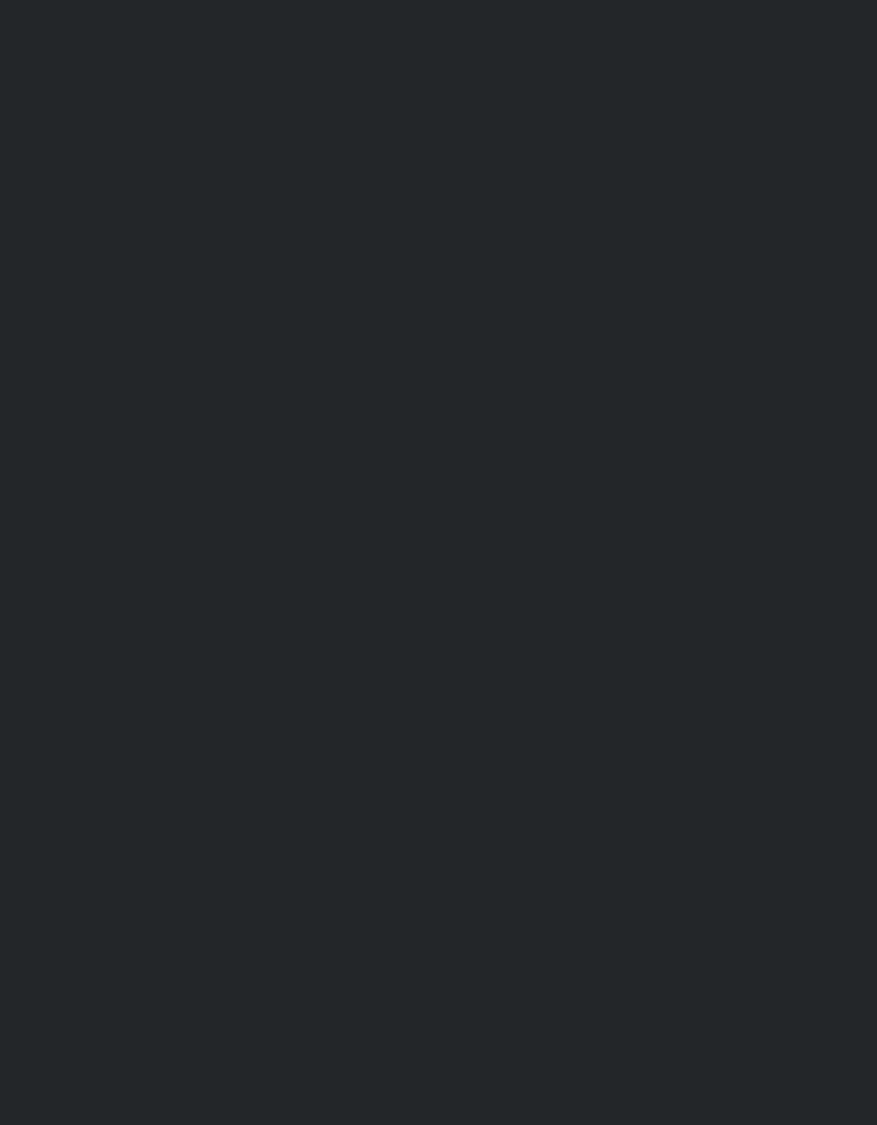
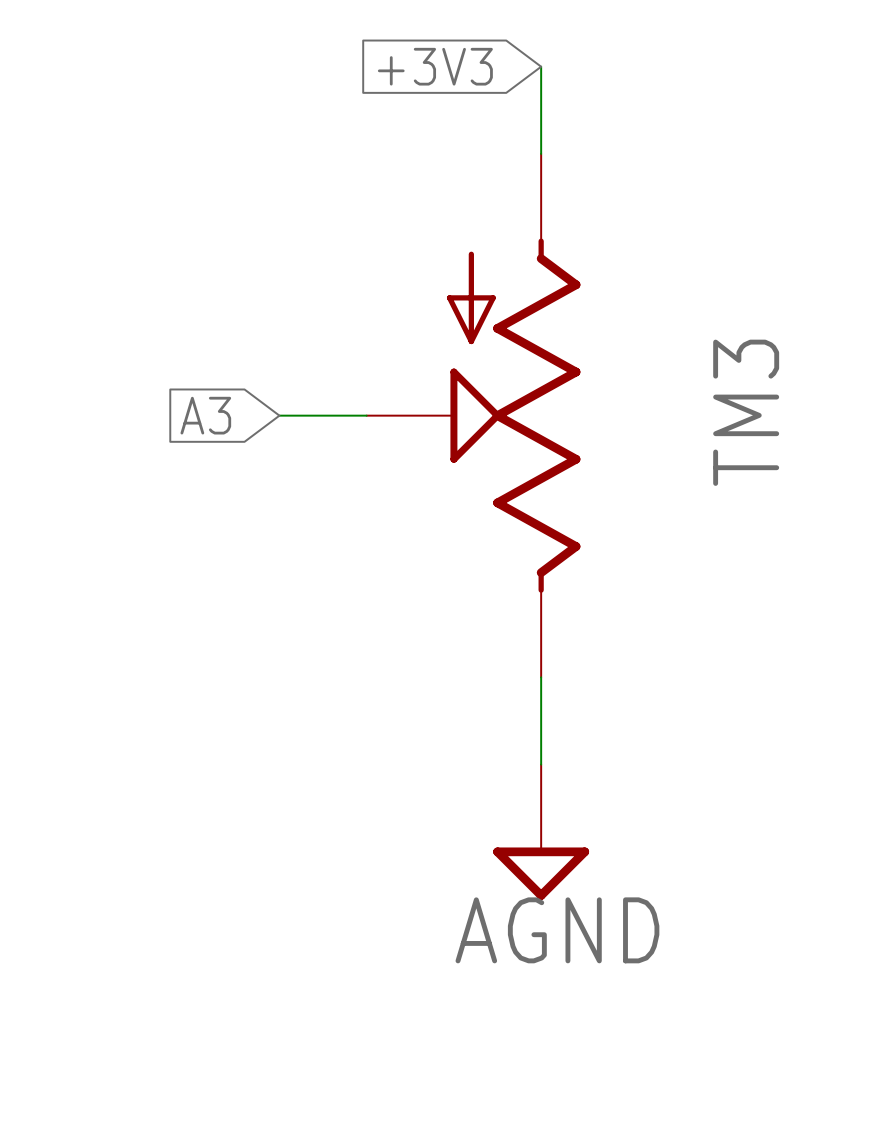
global label: none -> +3V3 (435, 66)
wire: none -> (541, 66) (541, 153)
global label: none -> A3 (205, 415)
wire: none -> (279, 415) (366, 415)
TM3: none -> (473, 415)
wire: none -> (541, 677) (541, 764)
power symbol: none -> AGND (541, 832)

